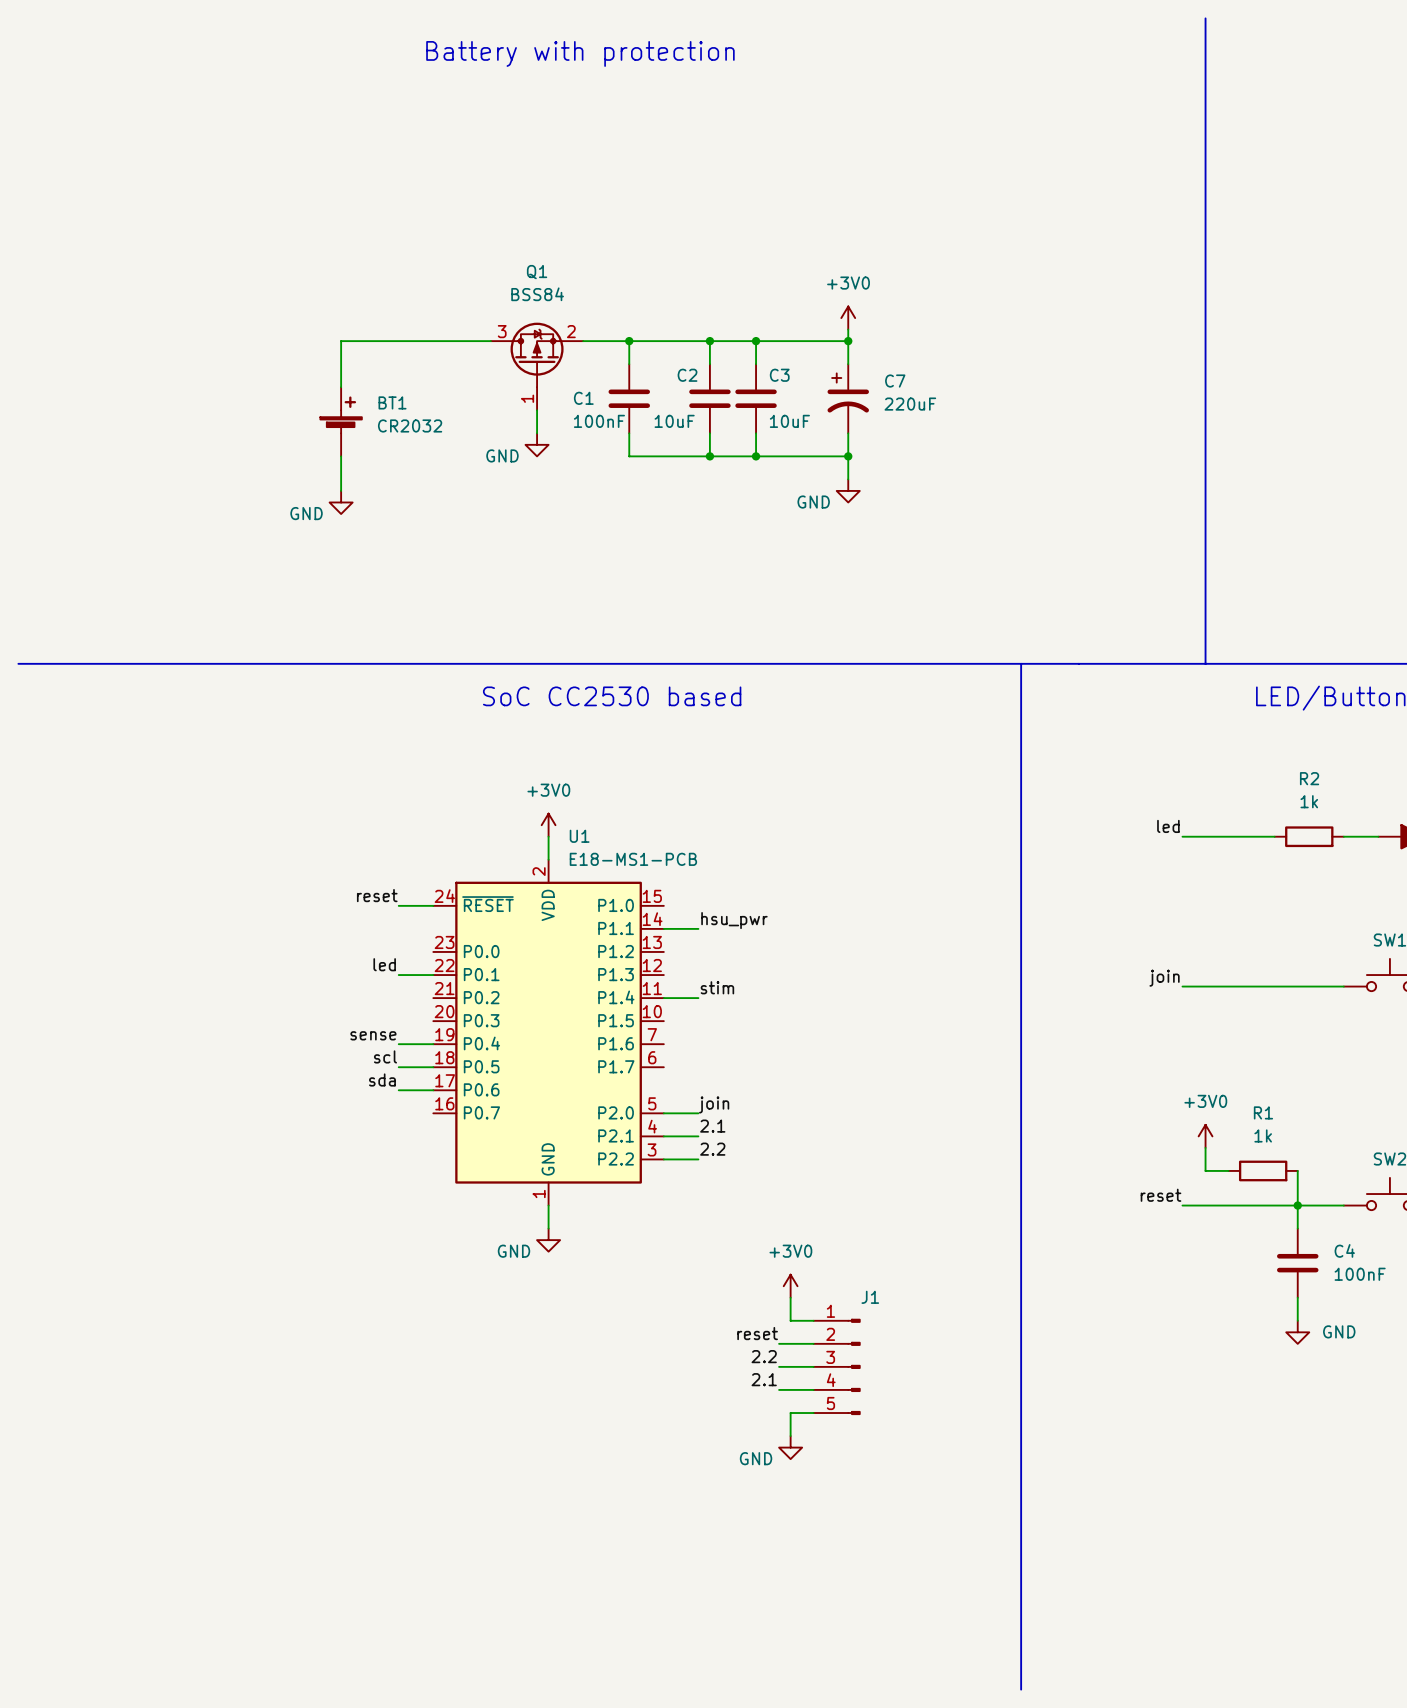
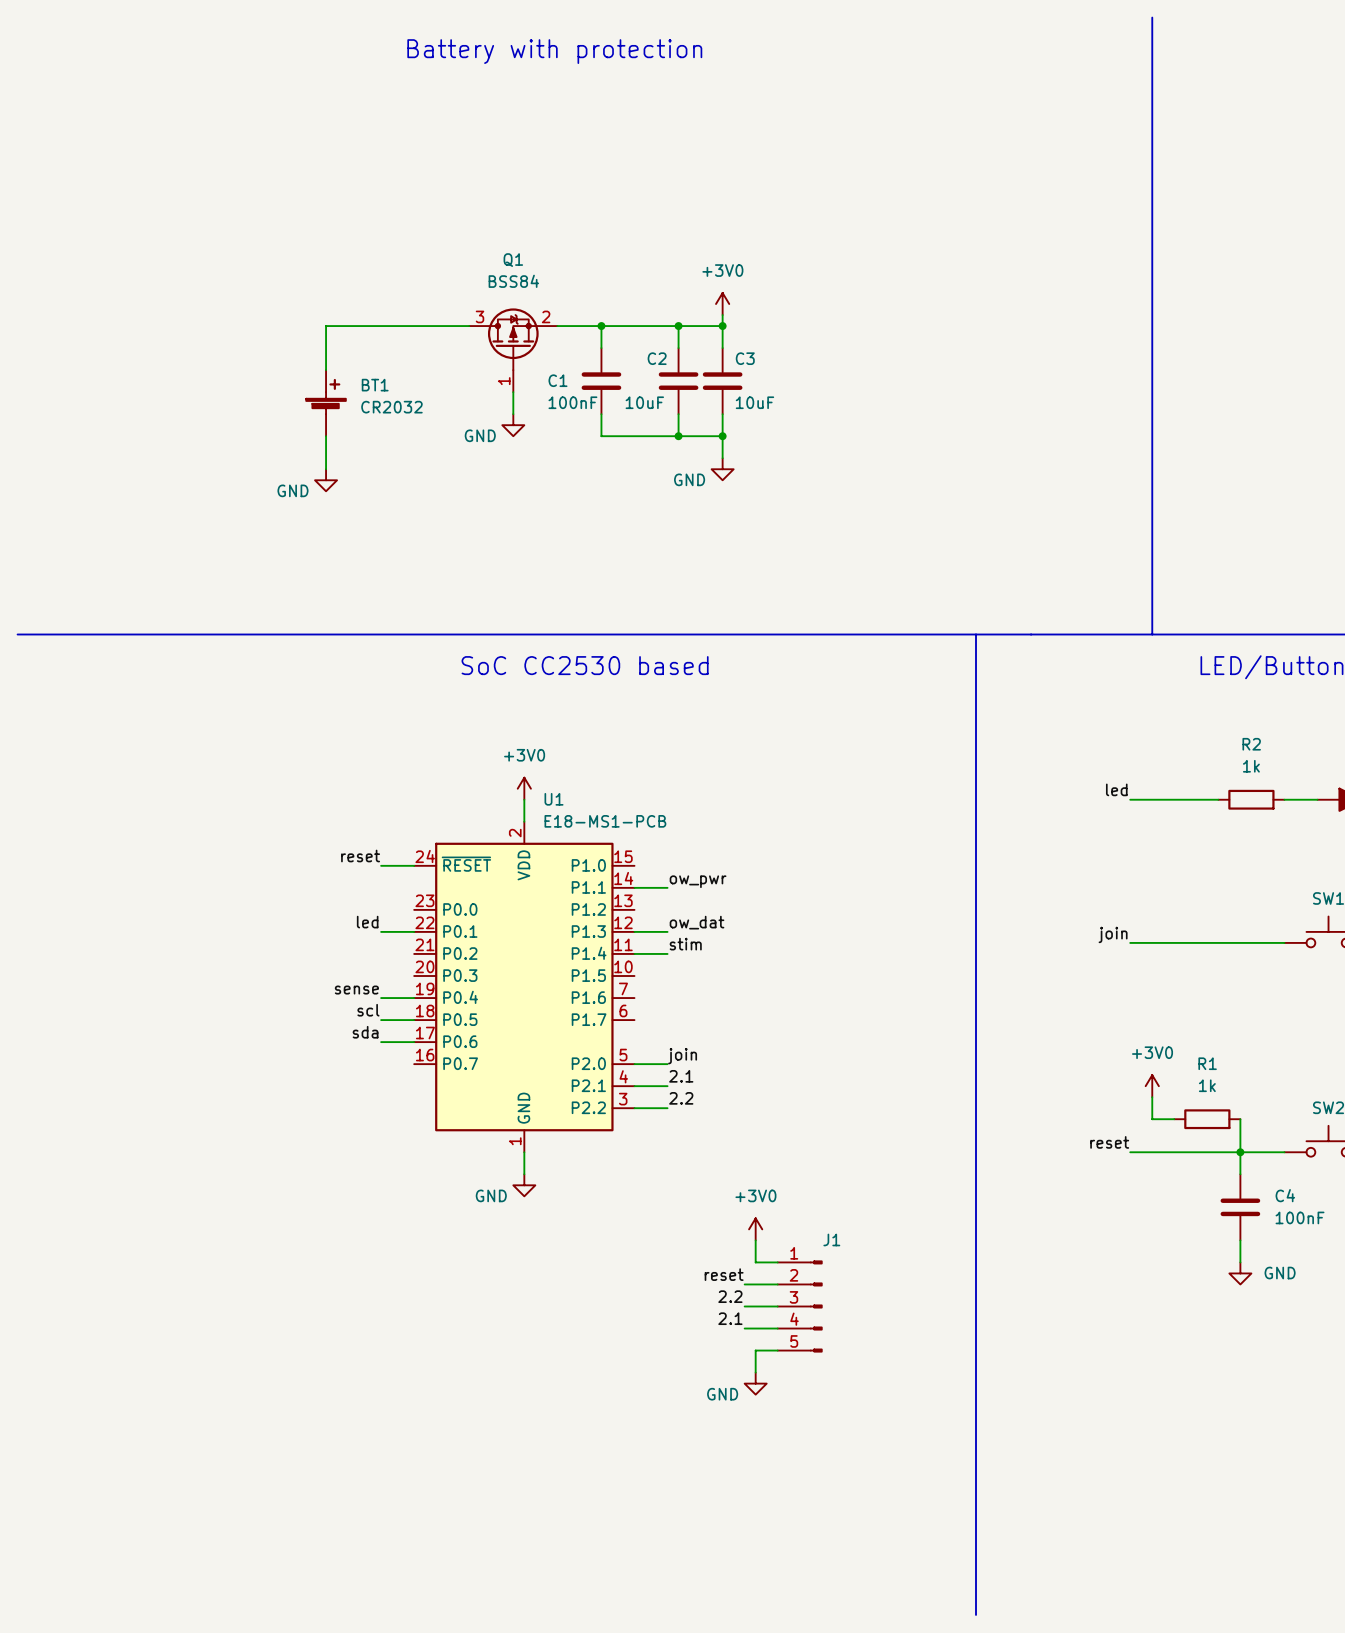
power symbol position: +3V0 (848, 318) -> +3V0 (722, 304)
wire: (848, 329) (848, 364) -> none
wire: (756, 341) (848, 341) -> (722, 326) (722, 315)
junction: (848, 341) -> none
C7: 220uF (848, 398) -> none
wire: (848, 433) (848, 479) -> none
wire: (756, 456) (848, 456) -> (722, 436) (722, 458)
junction: (848, 456) -> none
power symbol position: GND (848, 490) -> GND (722, 469)
label: hsu_pwr (734, 920) -> ow_pwr (698, 881)
label: none -> ow_dat (697, 922)
wire: none -> (634, 931) (667, 931)

